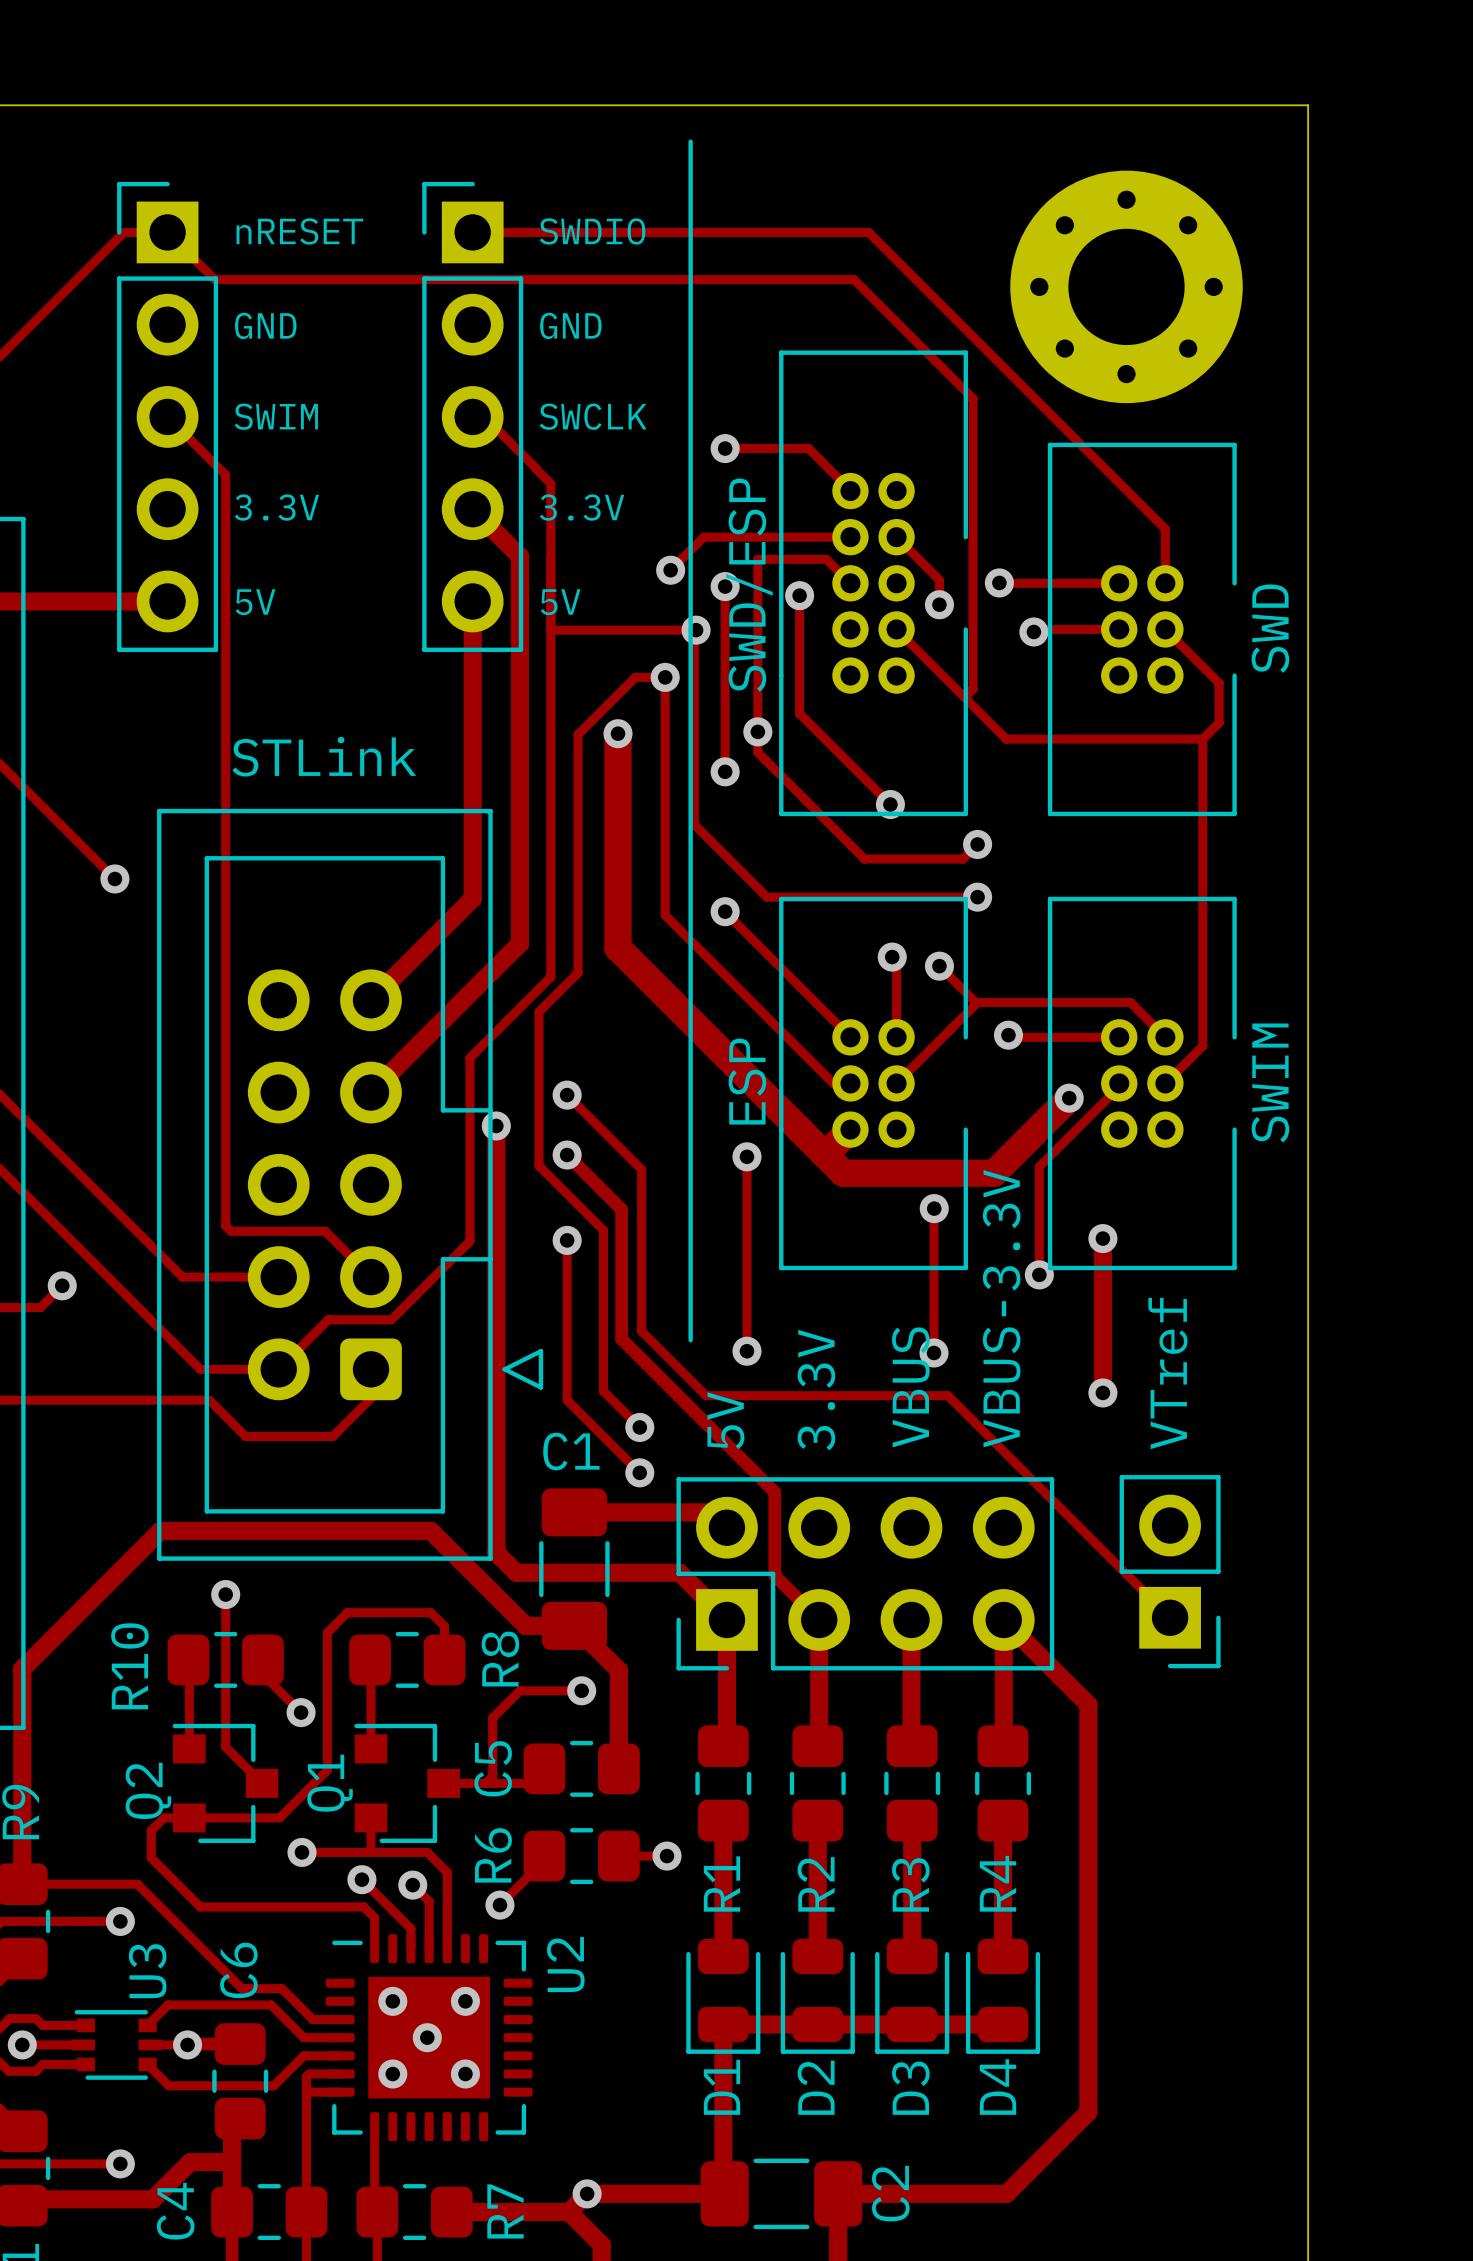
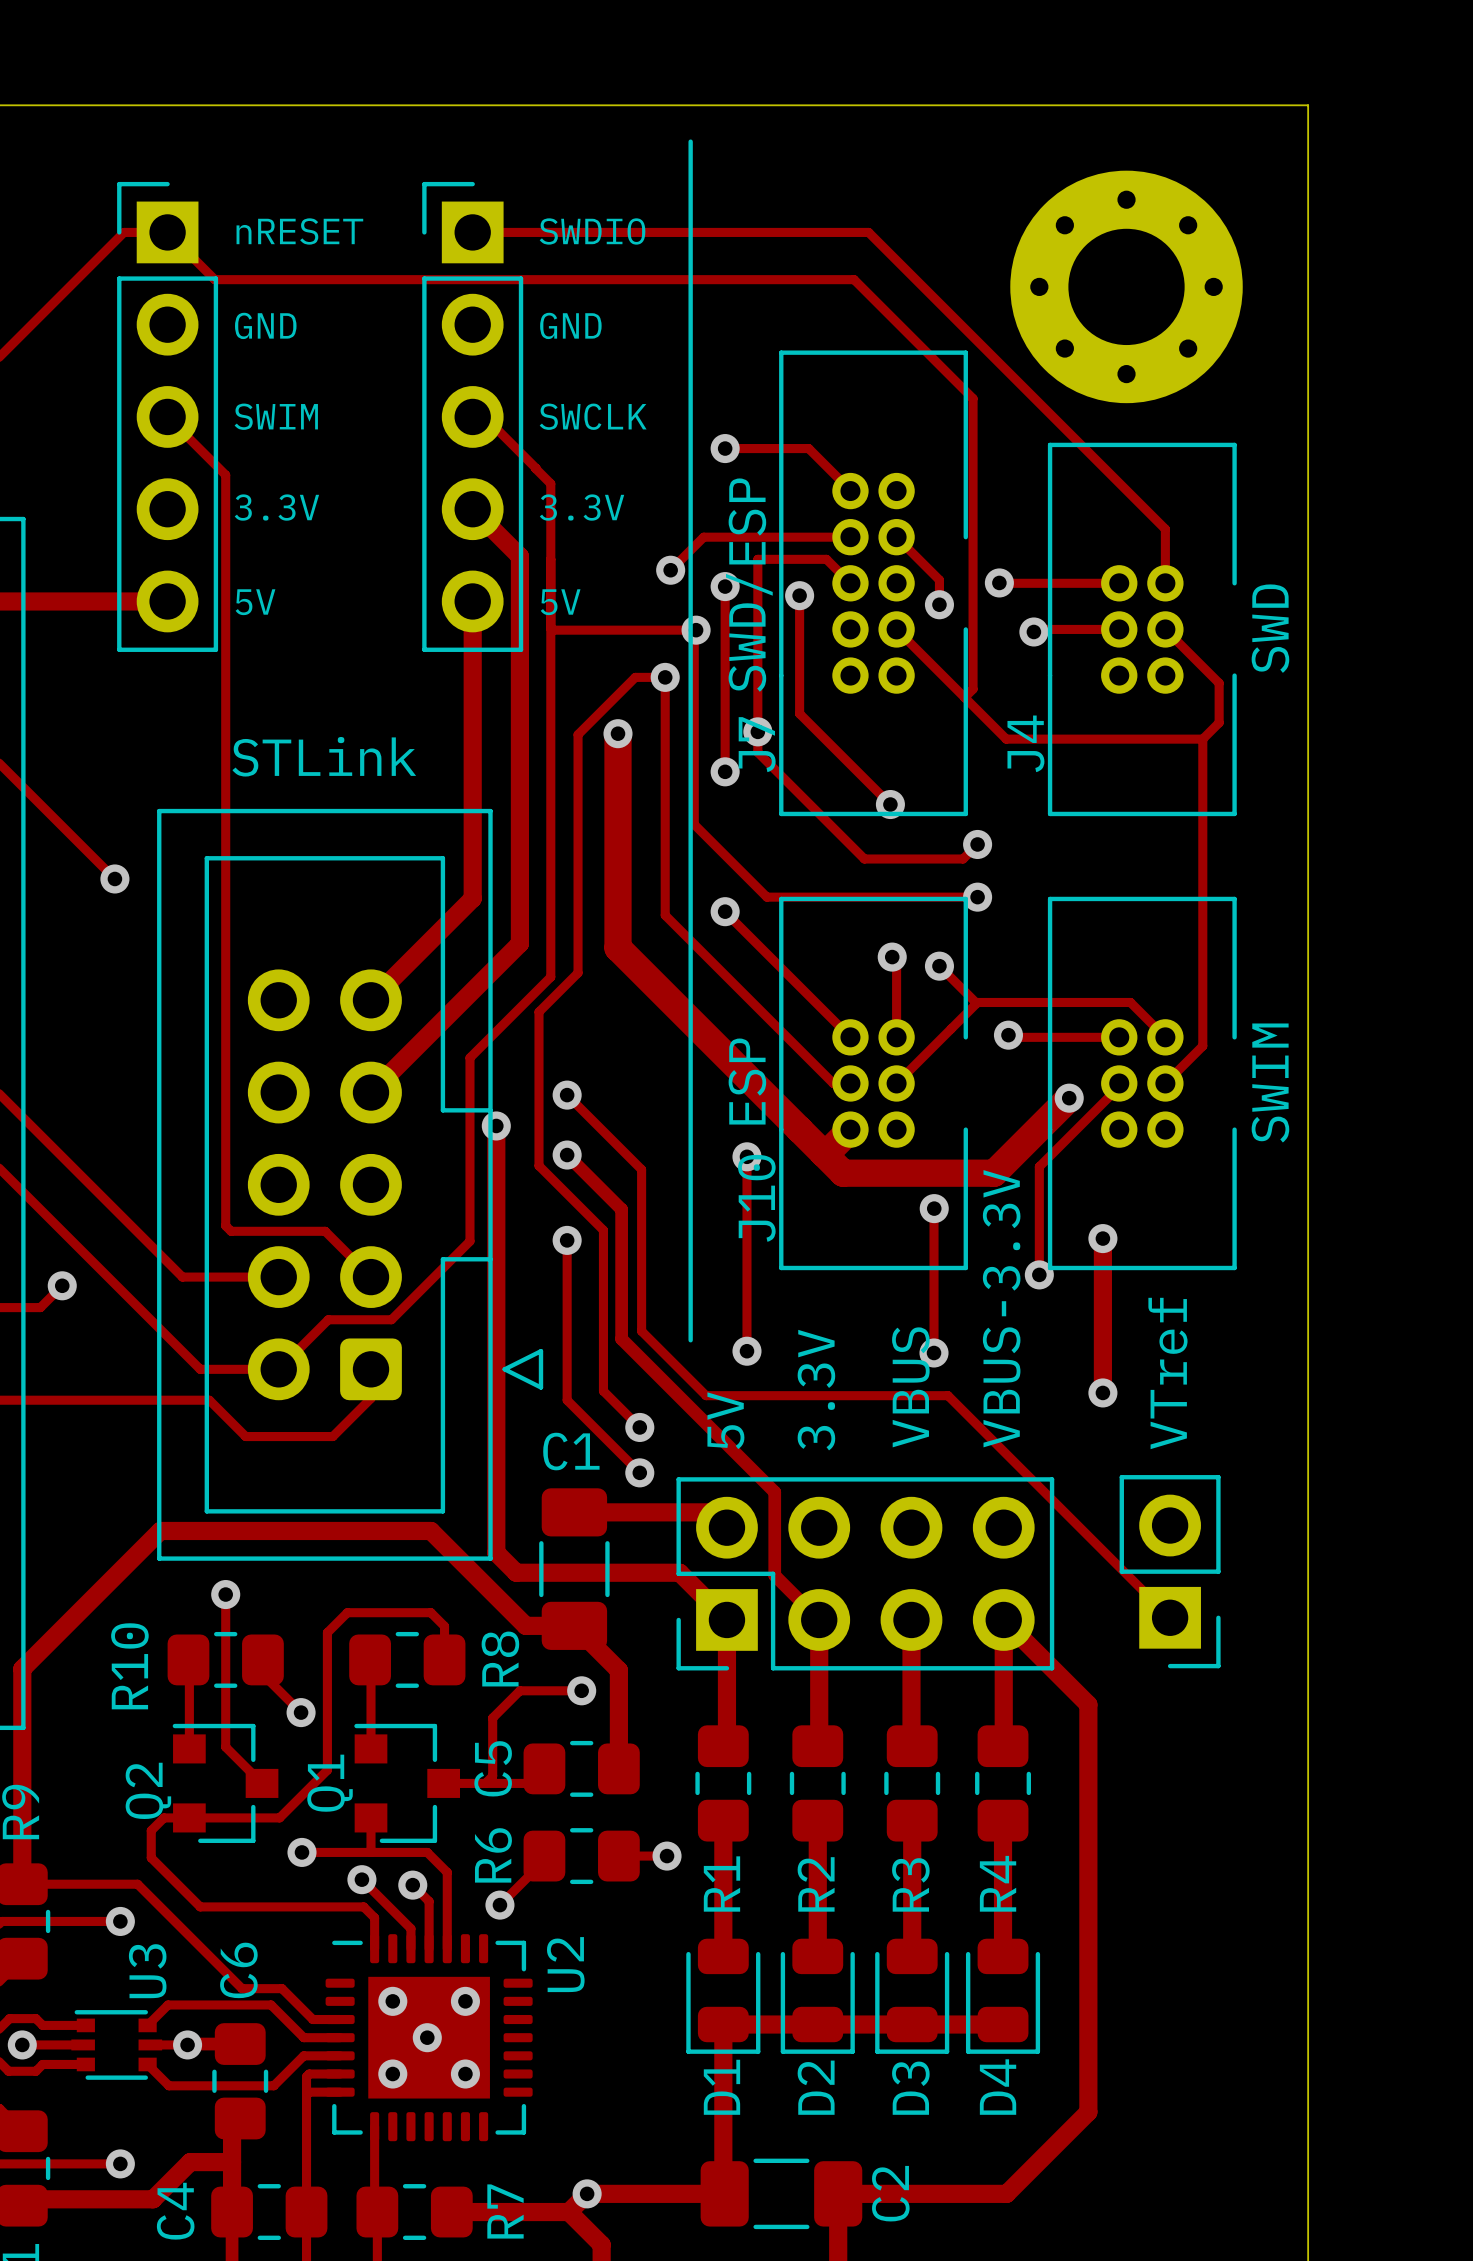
J4 name: none -> J4 (1025, 743)
J7 name: none -> J7 (757, 744)
J10 name: none -> J10 (756, 1198)

